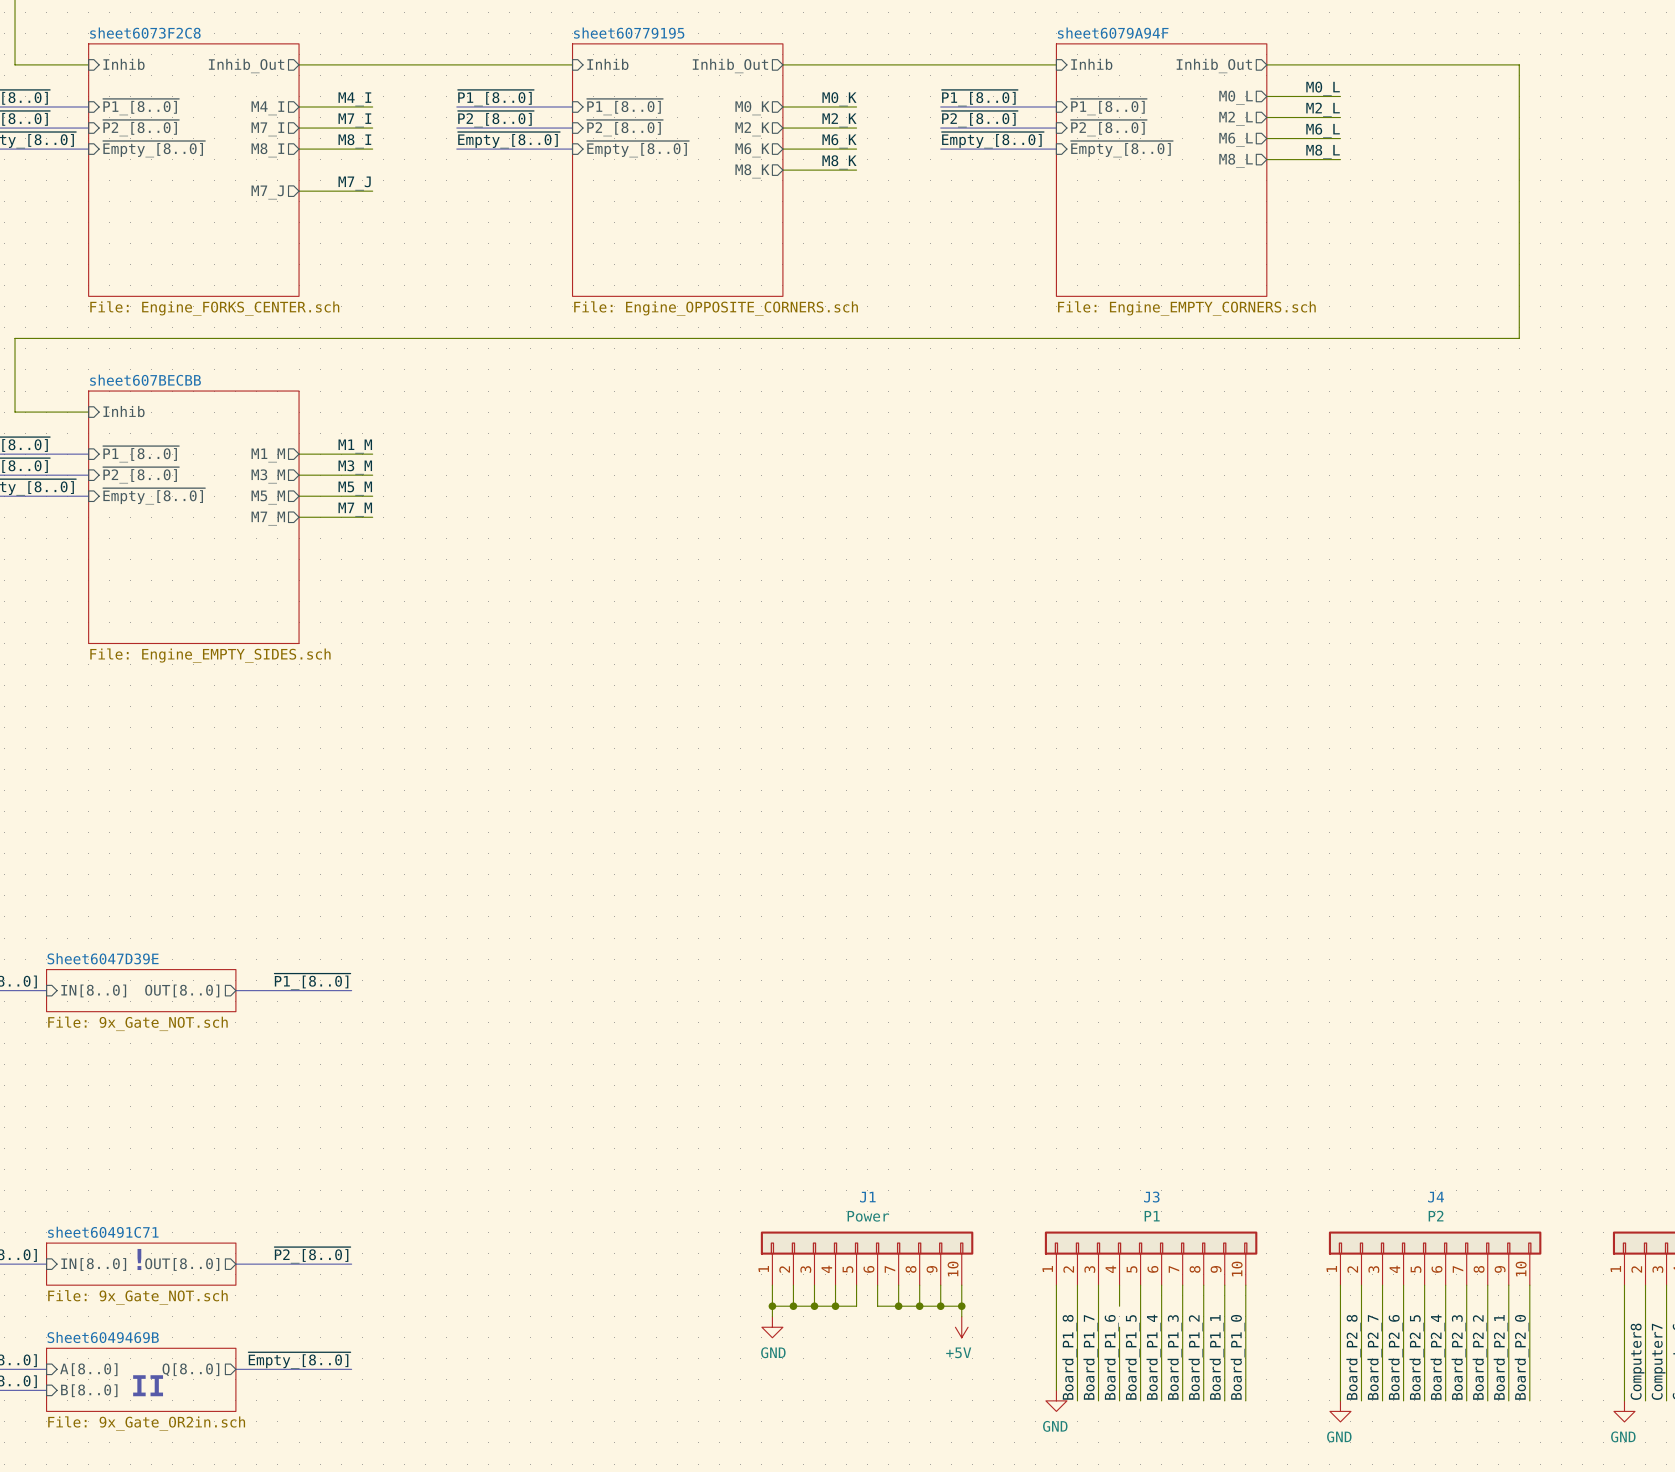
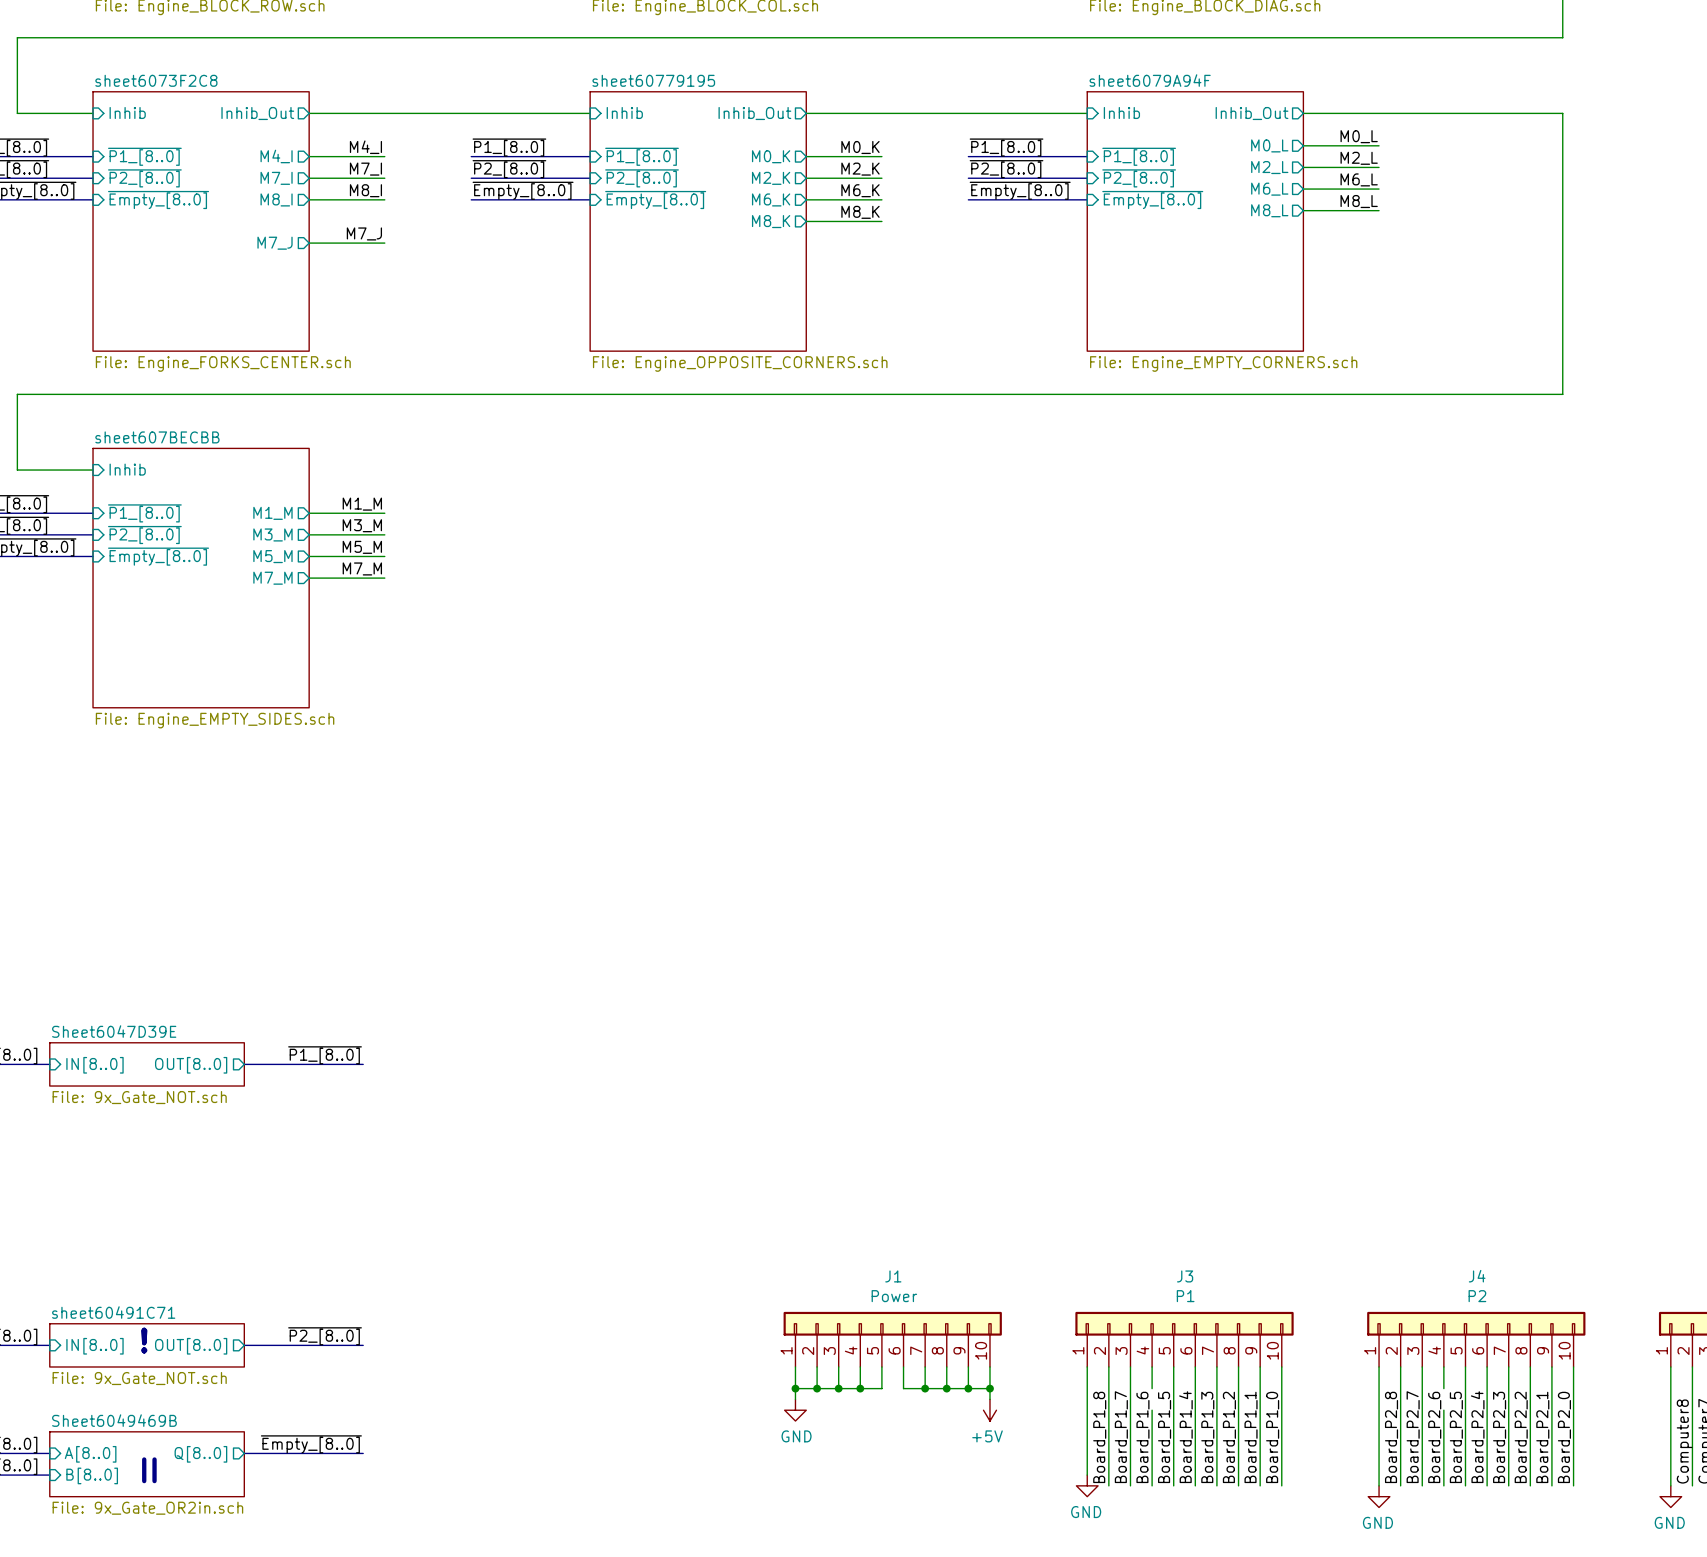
wire: (1403, 1306) (1403, 1327) -> none

